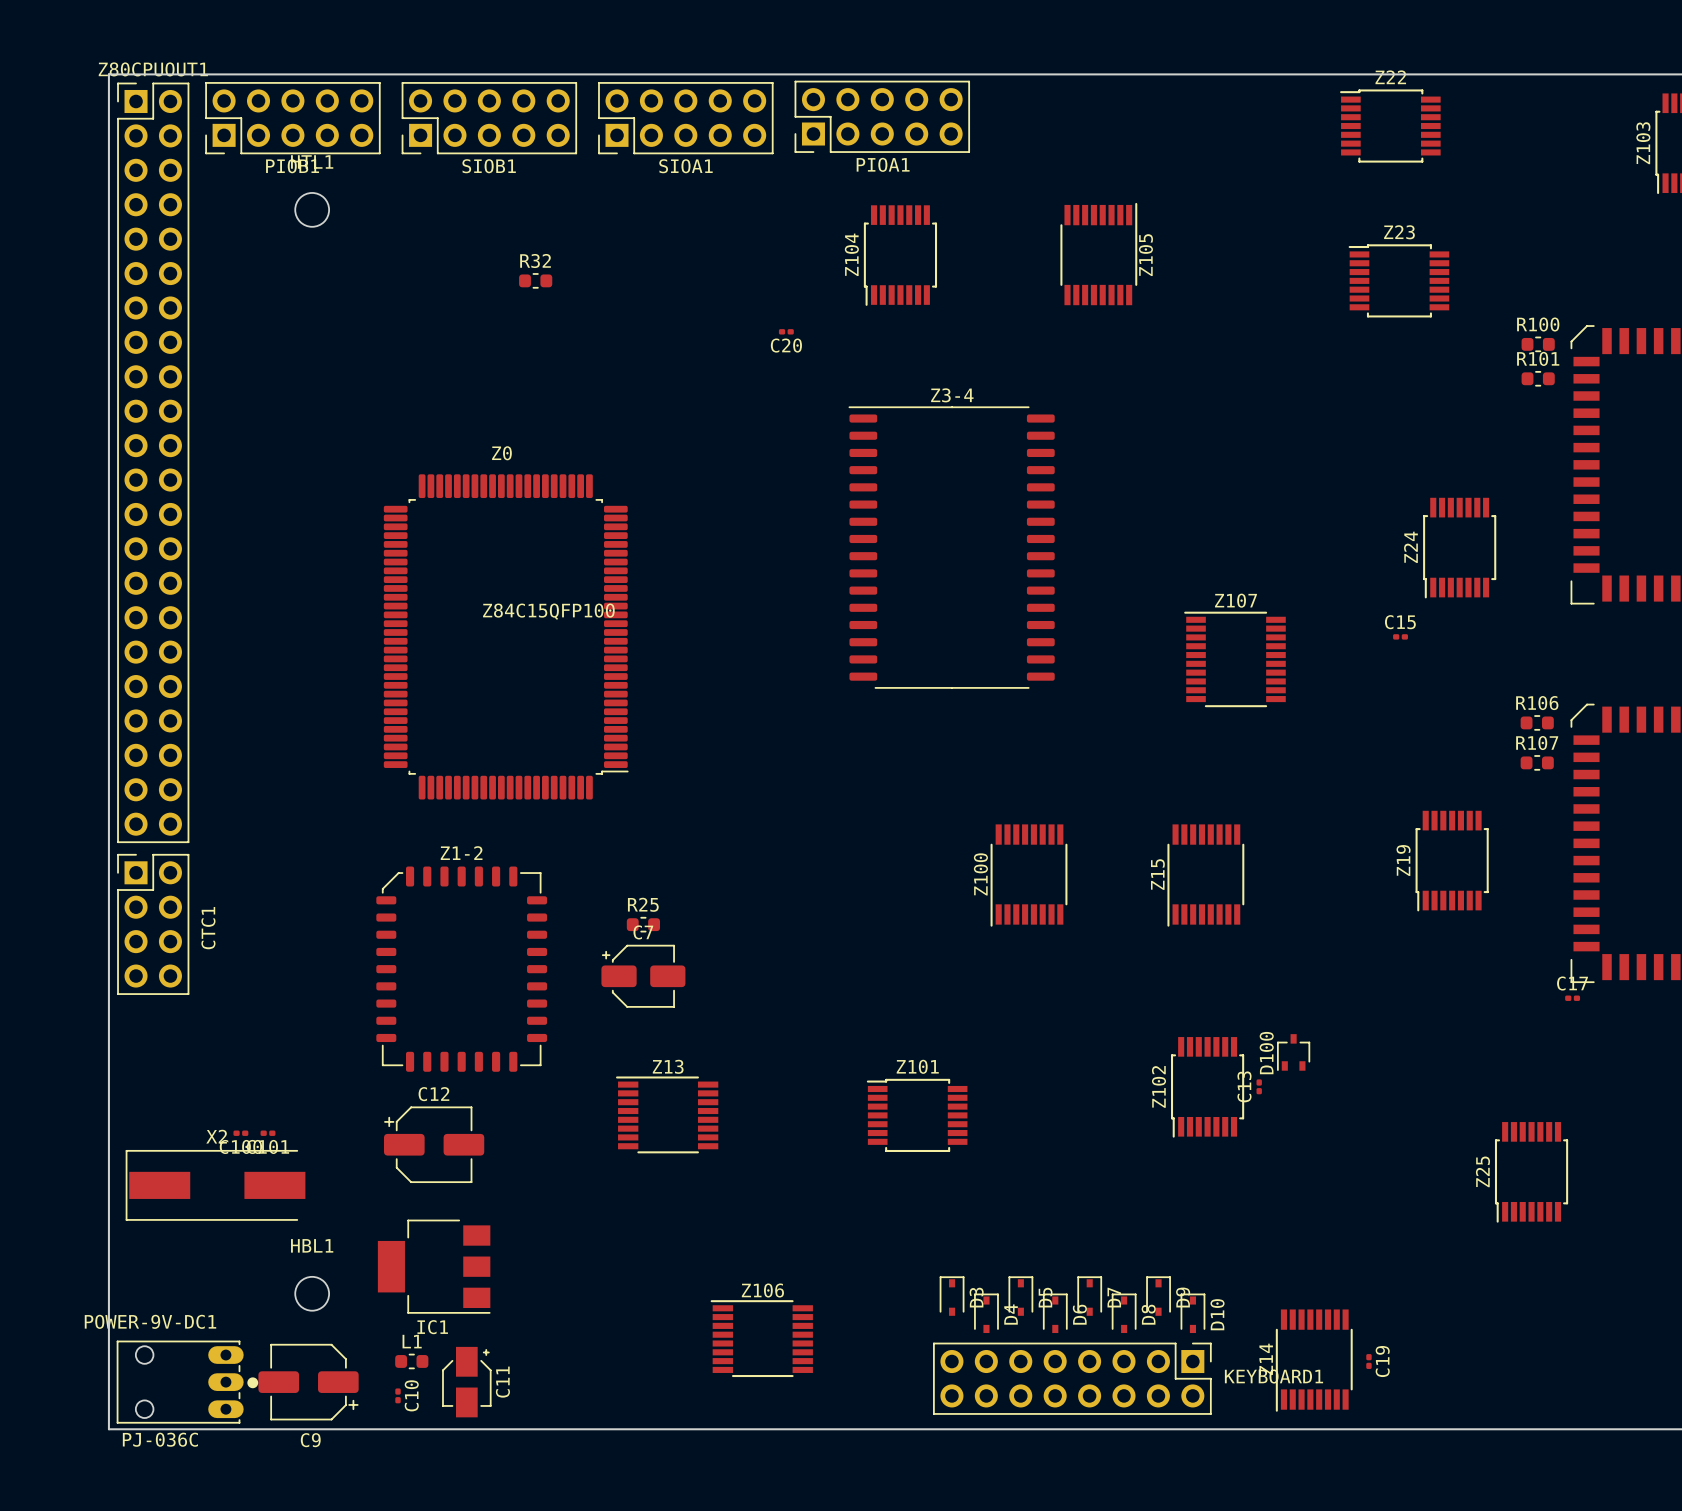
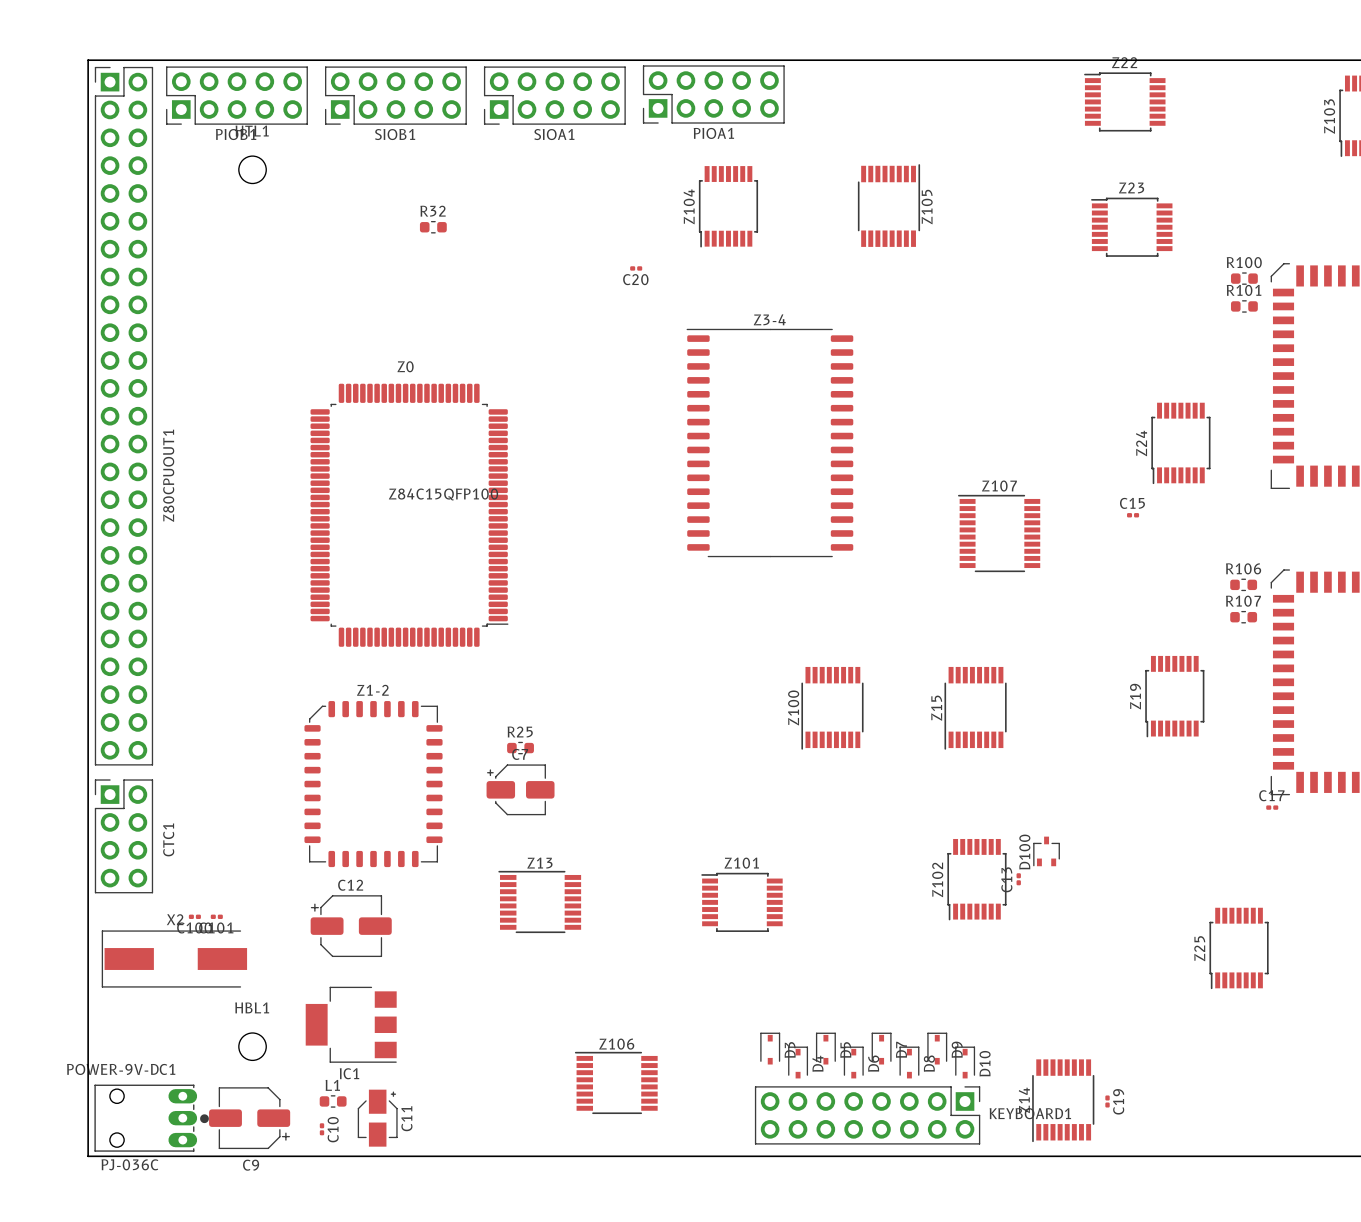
Z80CPUOUT1 name position: Z80CPUOUT1 (153, 69) -> Z80CPUOUT1 (168, 475)
Z80CPUOUT1 footprint: [117, 82, 190, 844] -> [94, 66, 154, 766]
CTC1 position: (153, 924) -> (123, 836)

